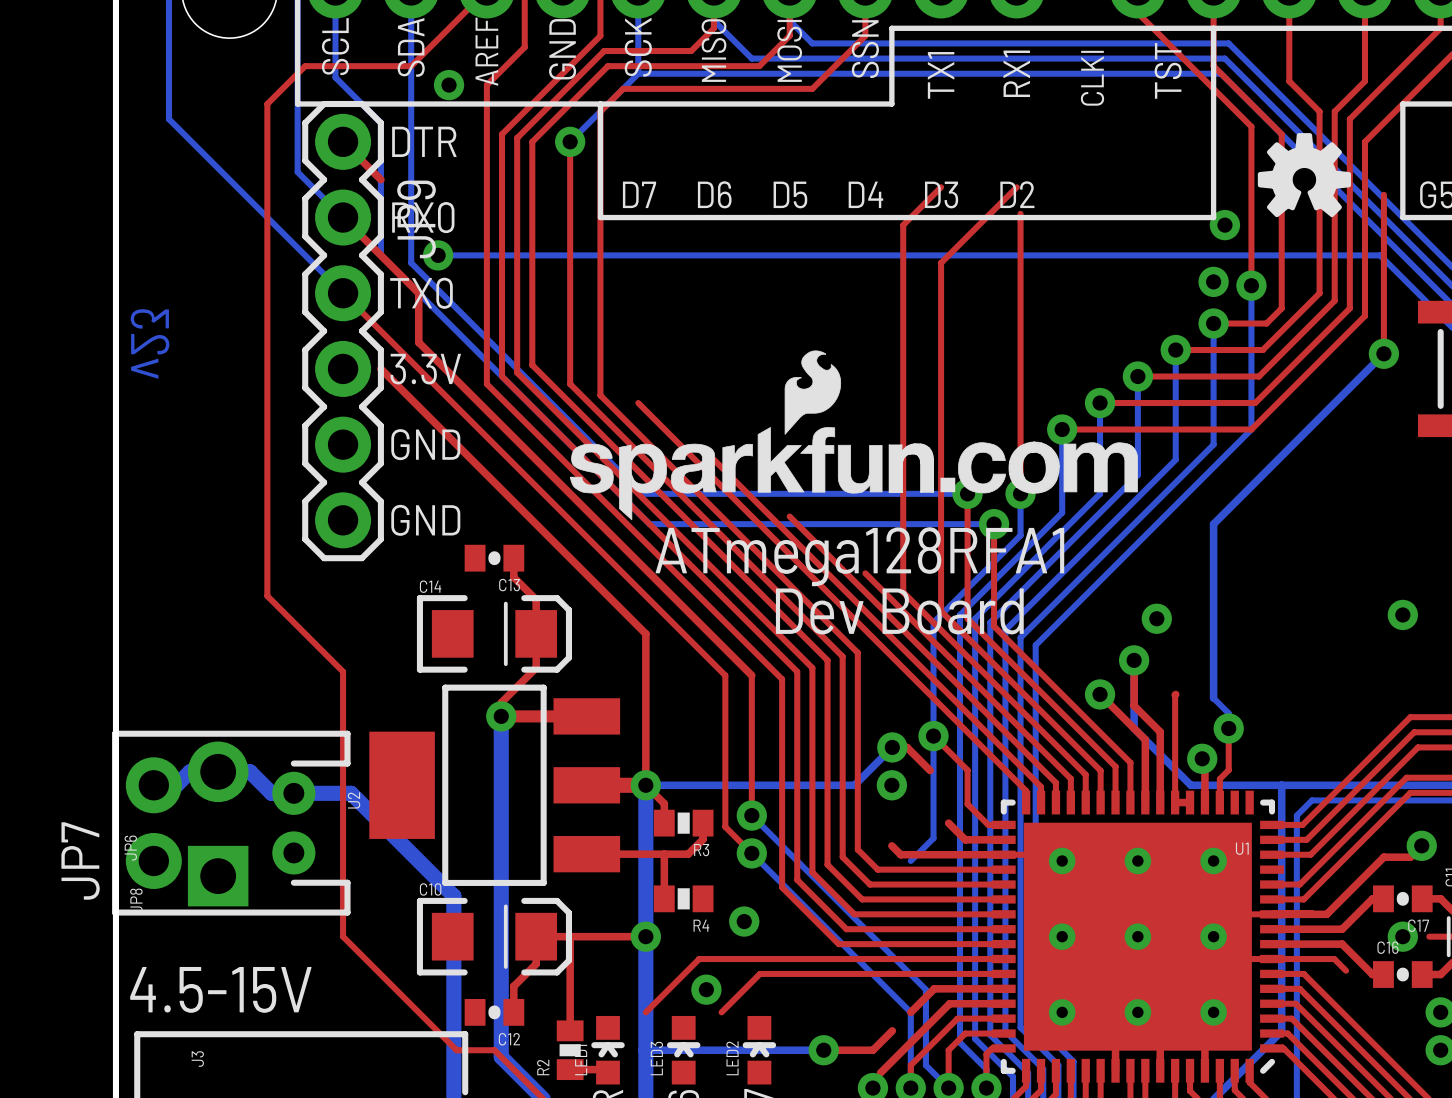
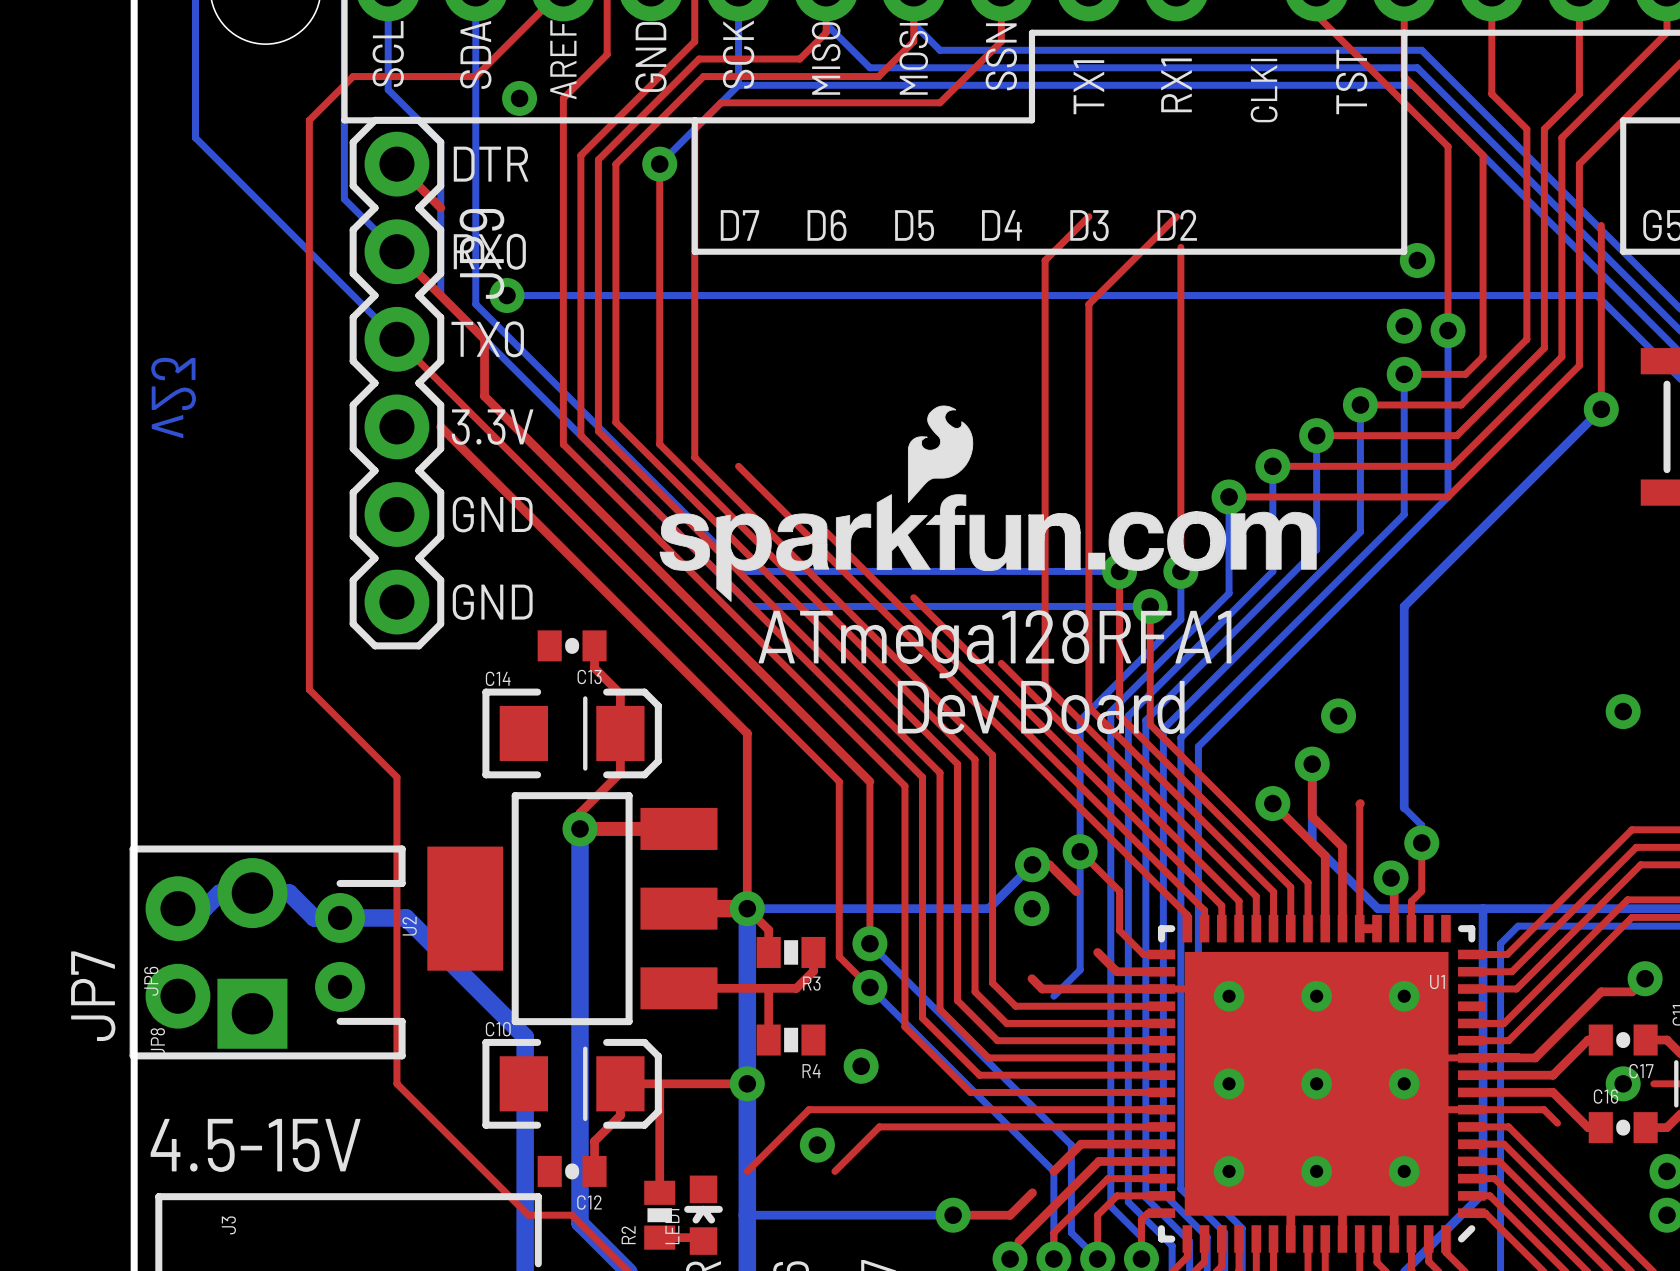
drawing: [1257, 133, 1352, 218] -> none
LED3: (683, 1050) -> none
LED2: (759, 1050) -> none

